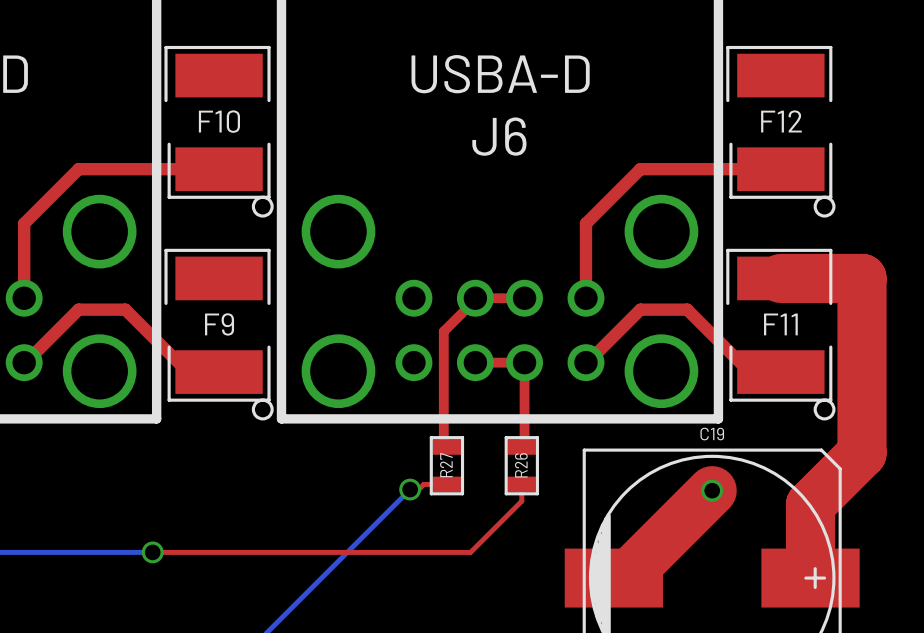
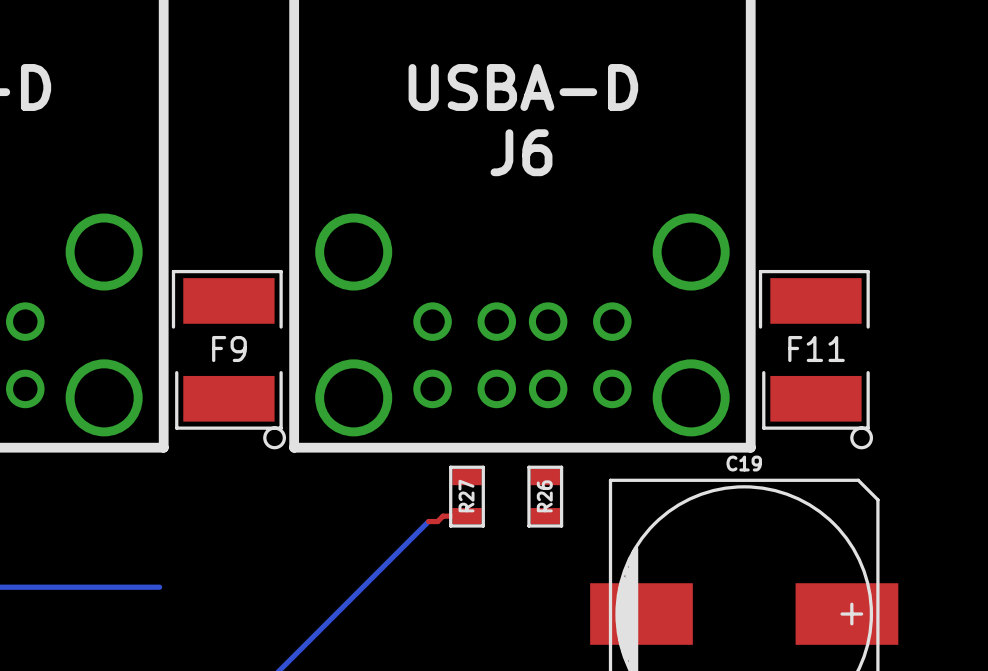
F10: (219, 131) -> none
F12: (780, 131) -> none
top track: (219, 169) (78, 169) (24, 223) (24, 298) -> none
top track: (780, 169) (640, 169) (585, 223) (585, 298) -> none
top track: (780, 278) (862, 278) (862, 453) (810, 504) (810, 578) -> none
top track: (524, 298) (475, 298) (443, 331) (443, 443) (446, 446) -> none
top track: (24, 362) (78, 309) (125, 309) (187, 372) (219, 372) -> none
top track: (475, 362) (524, 362) (524, 444) (521, 446) -> none
top track: (585, 362) (640, 309) (687, 309) (749, 372) (780, 372) -> none
top track: (521, 484) (521, 501) (470, 552) (152, 552) -> none
via: (410, 489) -> none
top track: (712, 490) (624, 578) (613, 578) -> none
via: (712, 490) -> none
via: (152, 552) -> none

